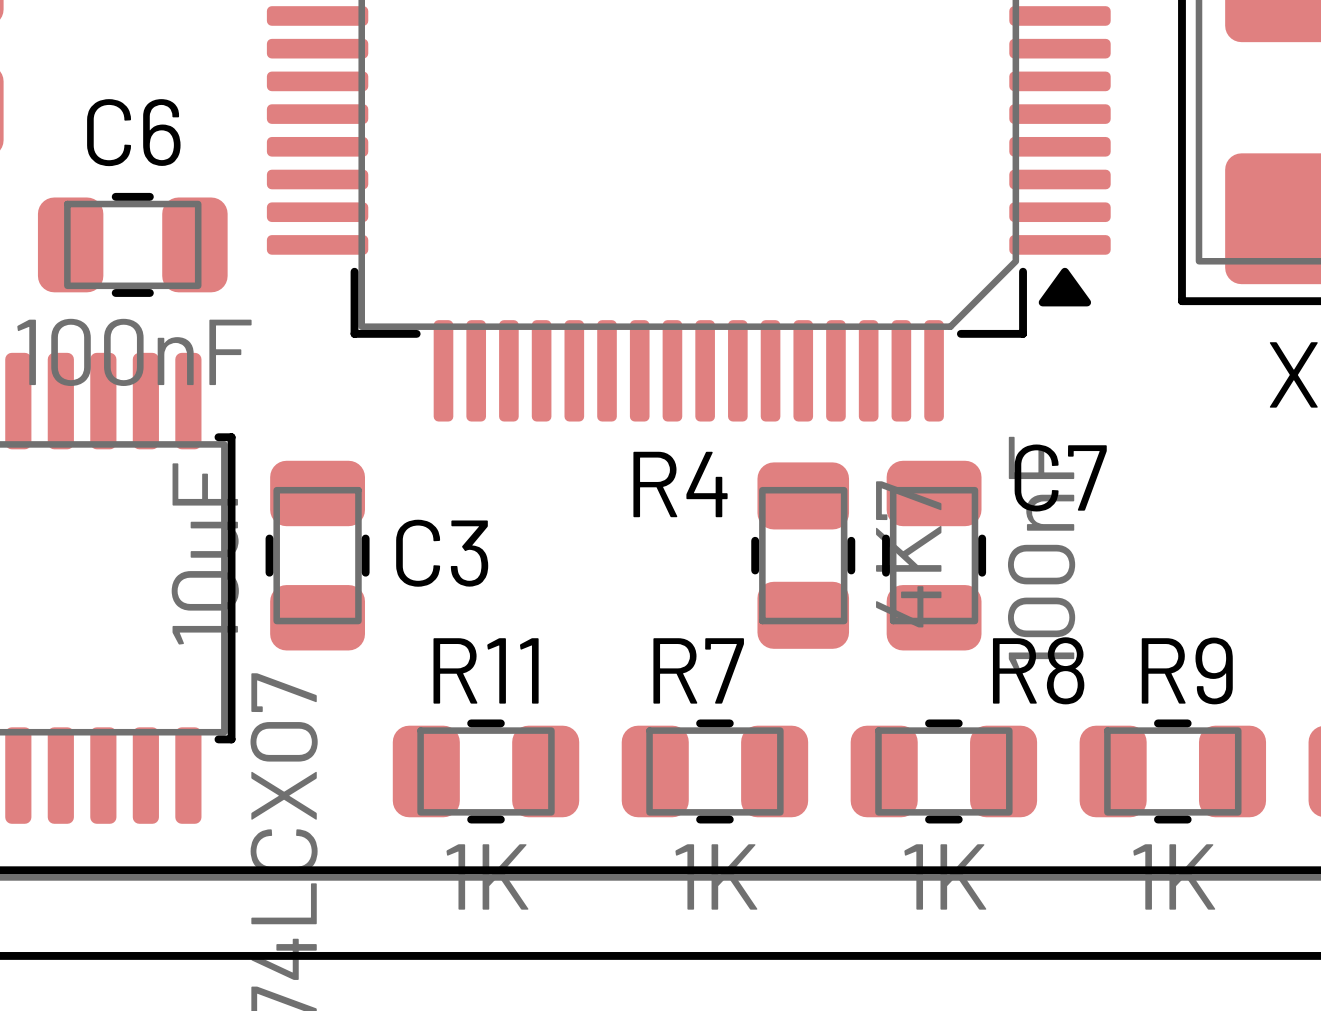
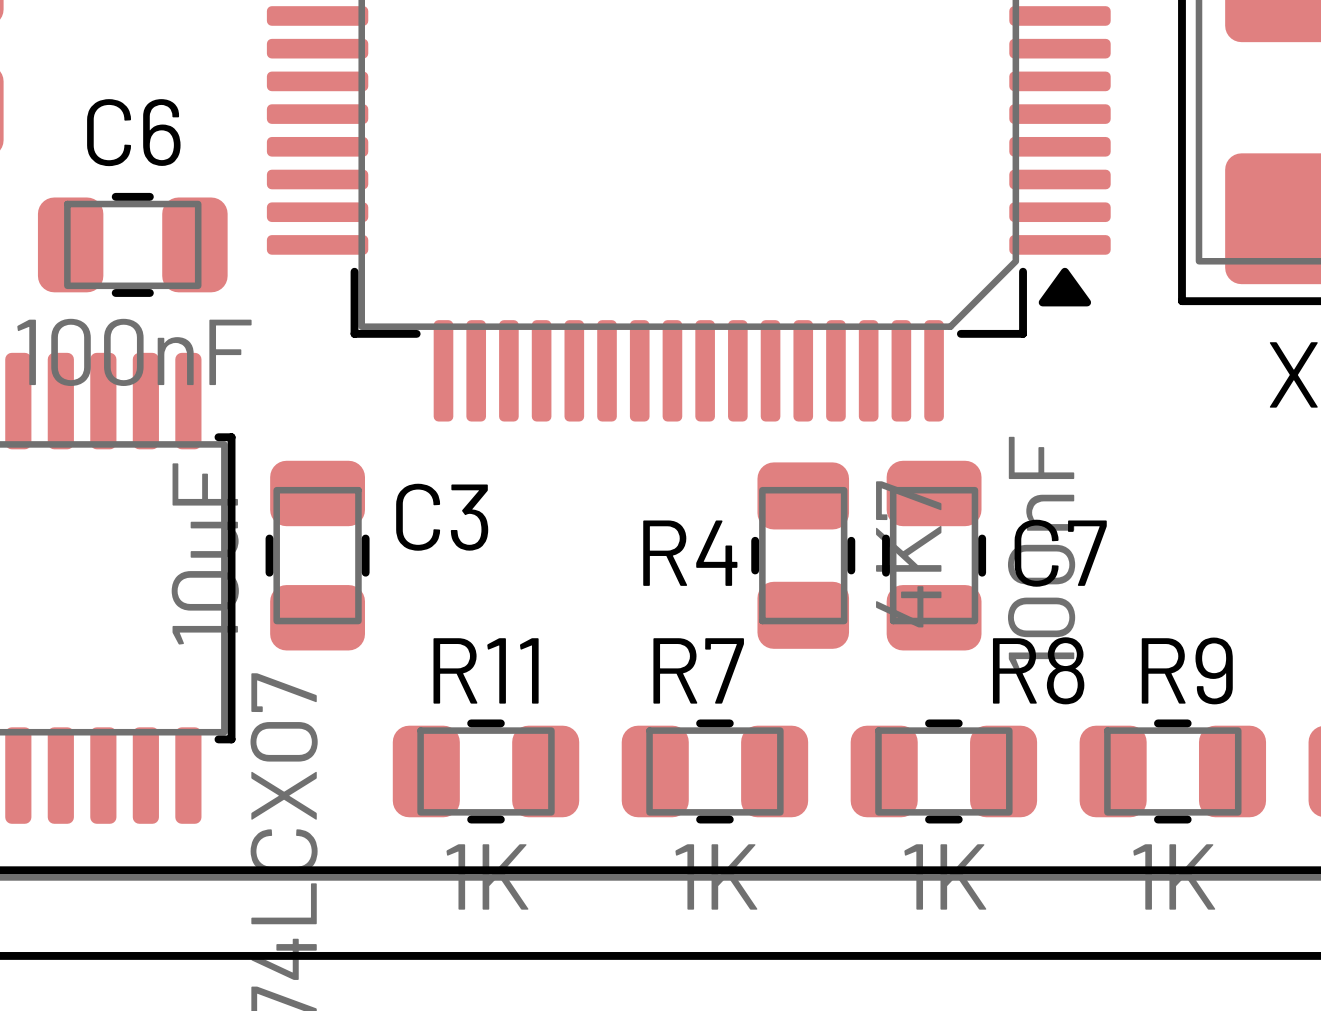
C7 name position: C7 (1060, 478) -> C7 (1060, 553)
R4 name position: R4 (680, 484) -> R4 (690, 553)
C3 name position: C3 (442, 553) -> C3 (442, 517)

